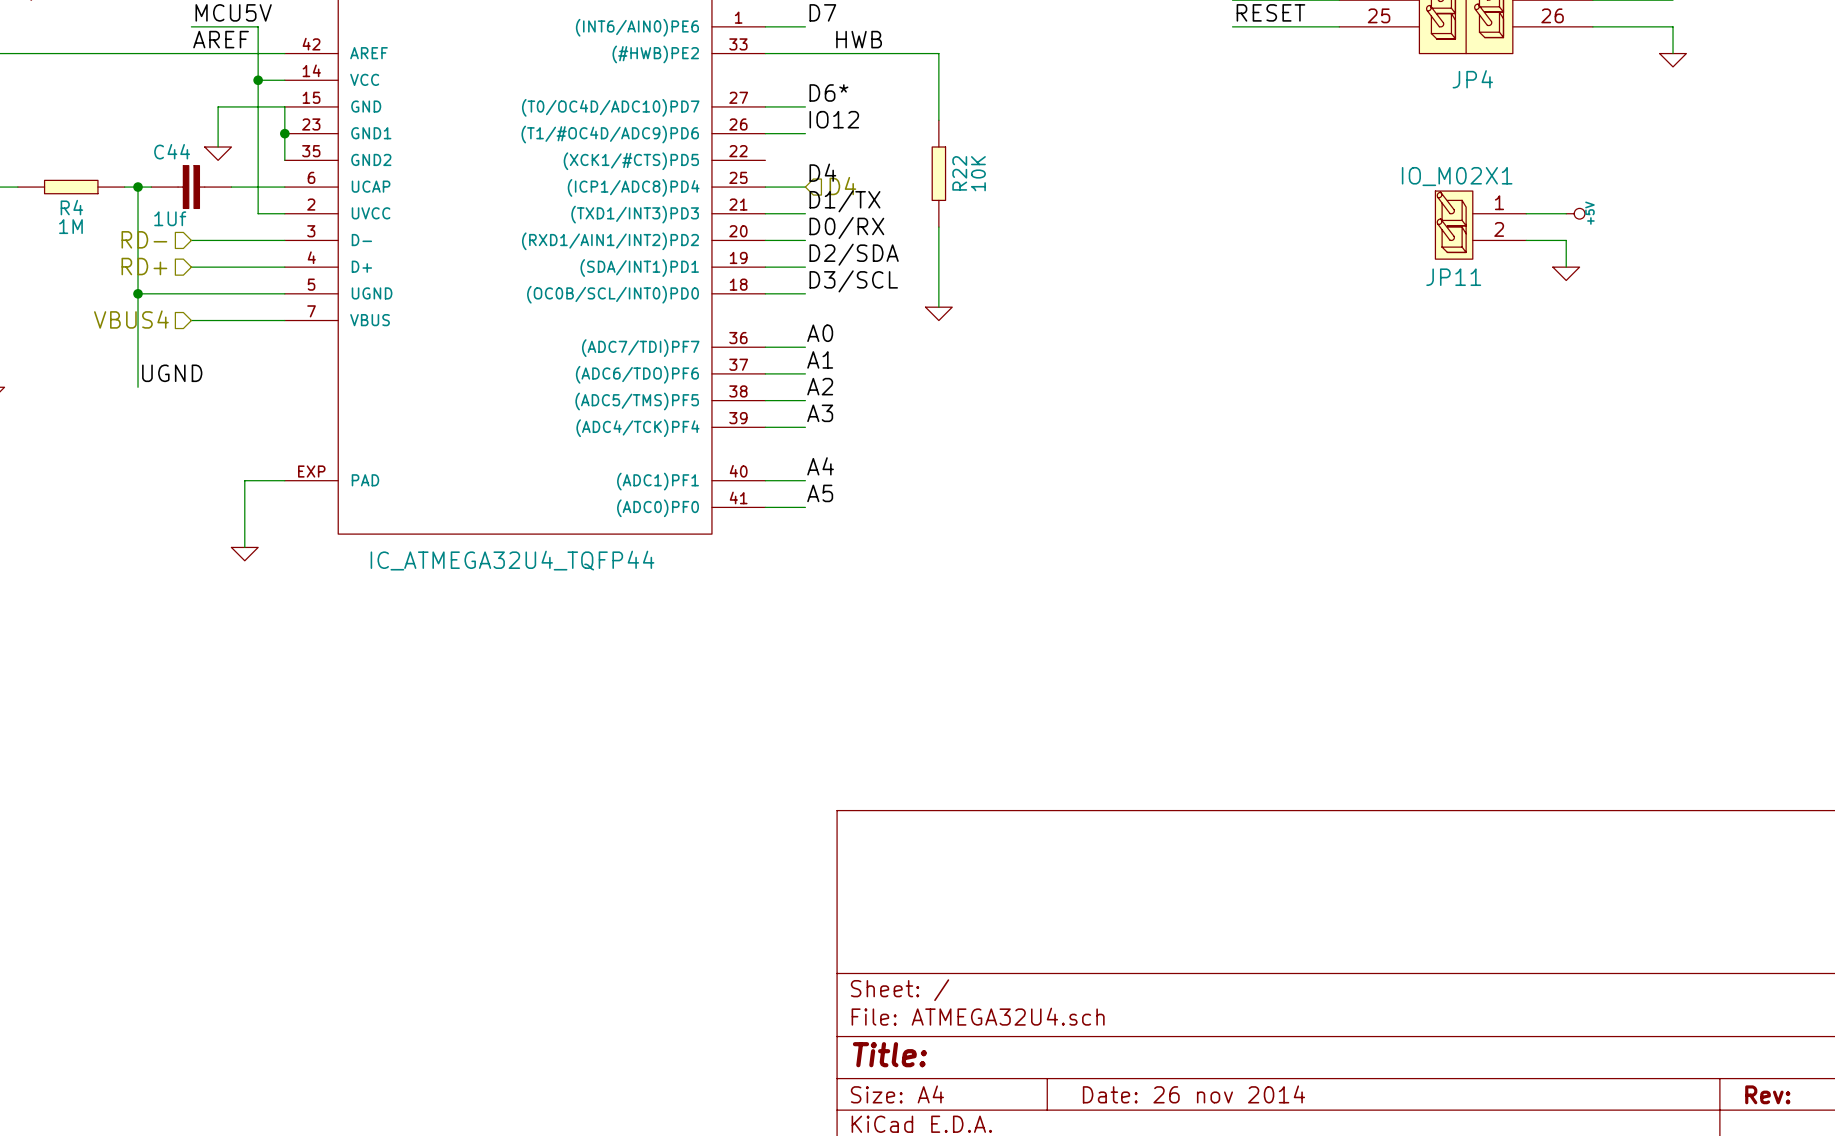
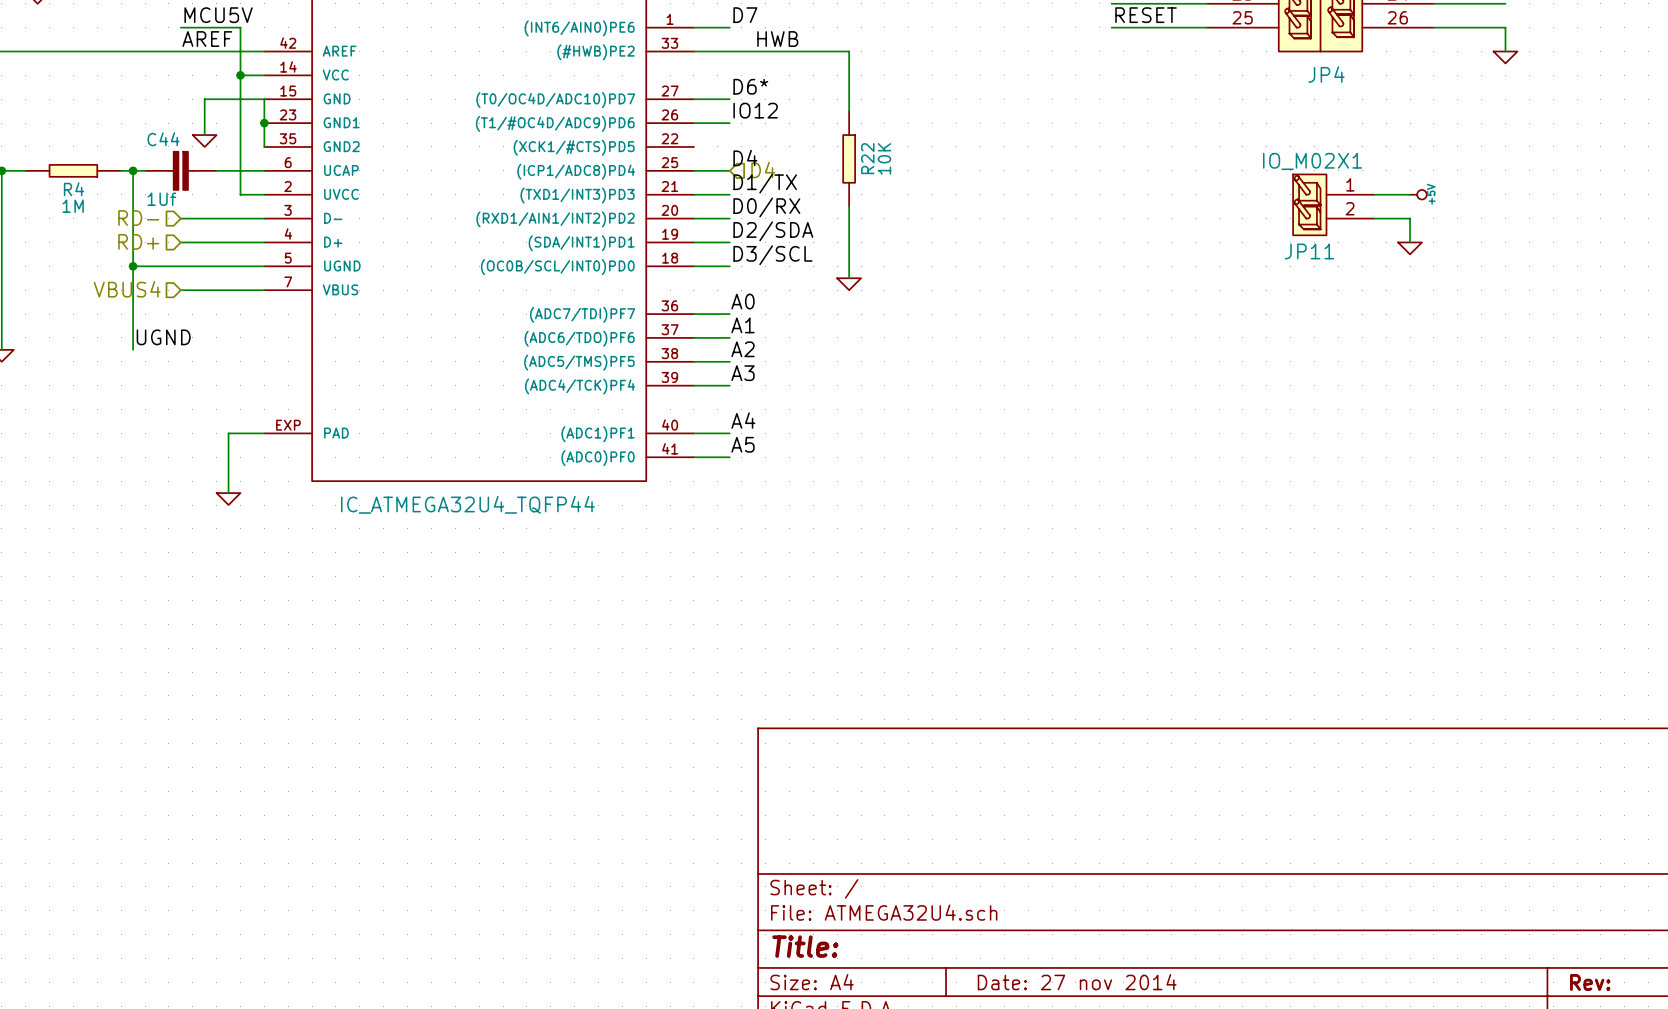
title block: Date: 26 nov 2014 (1193, 1094) -> Date: 27 nov 2014 (1077, 982)

